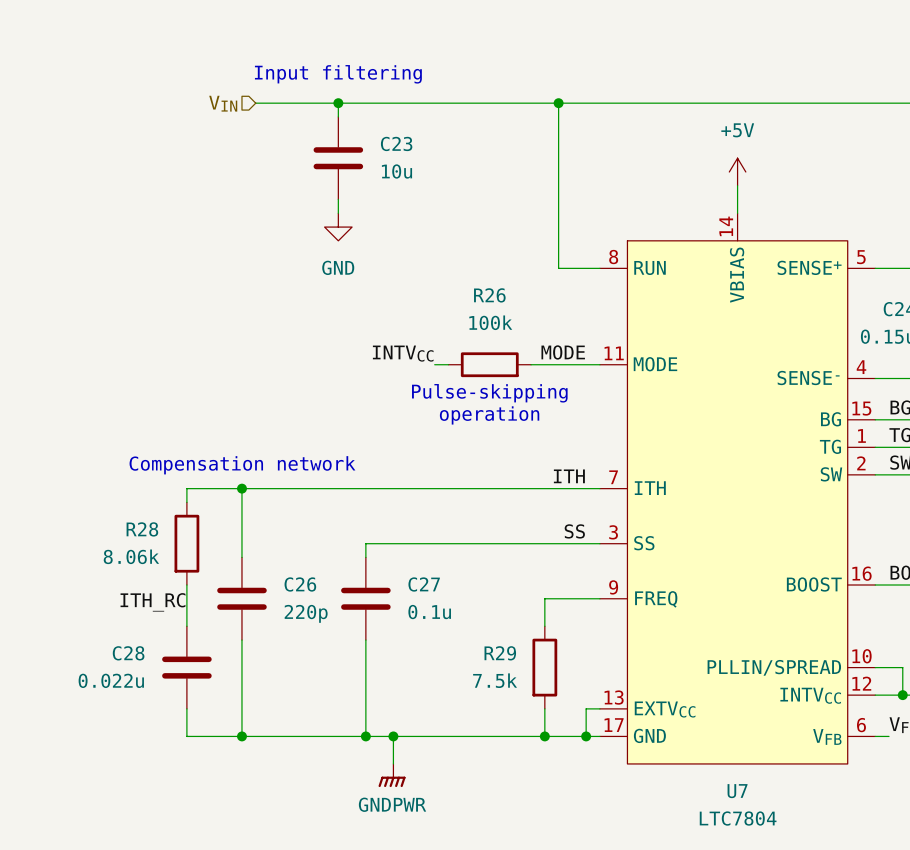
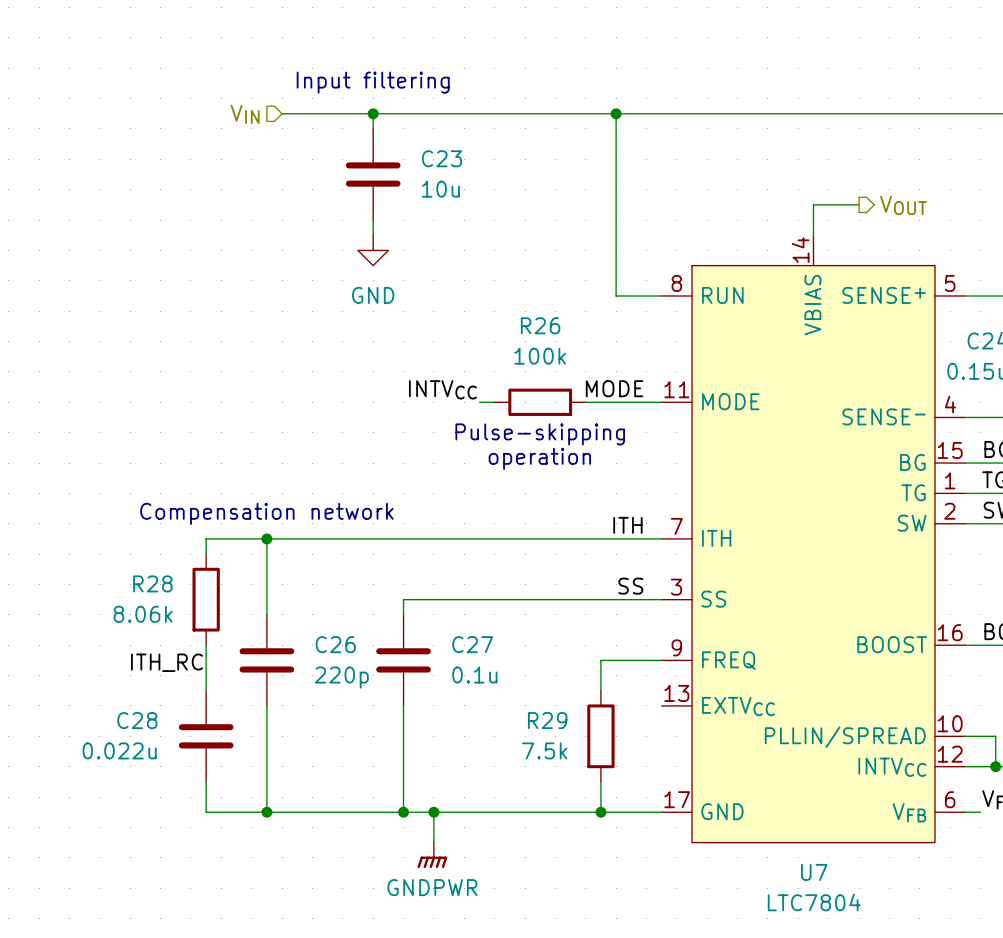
power symbol: +5V (737, 172) -> none
wire: none -> (813, 204) (859, 204)
hierarchical label: none -> VOUT (903, 205)
U7 symbol: [599, 213, 876, 764] -> [661, 235, 966, 843]
wire: (599, 708) (586, 708) (586, 736) -> none
junction: (586, 736) -> none

